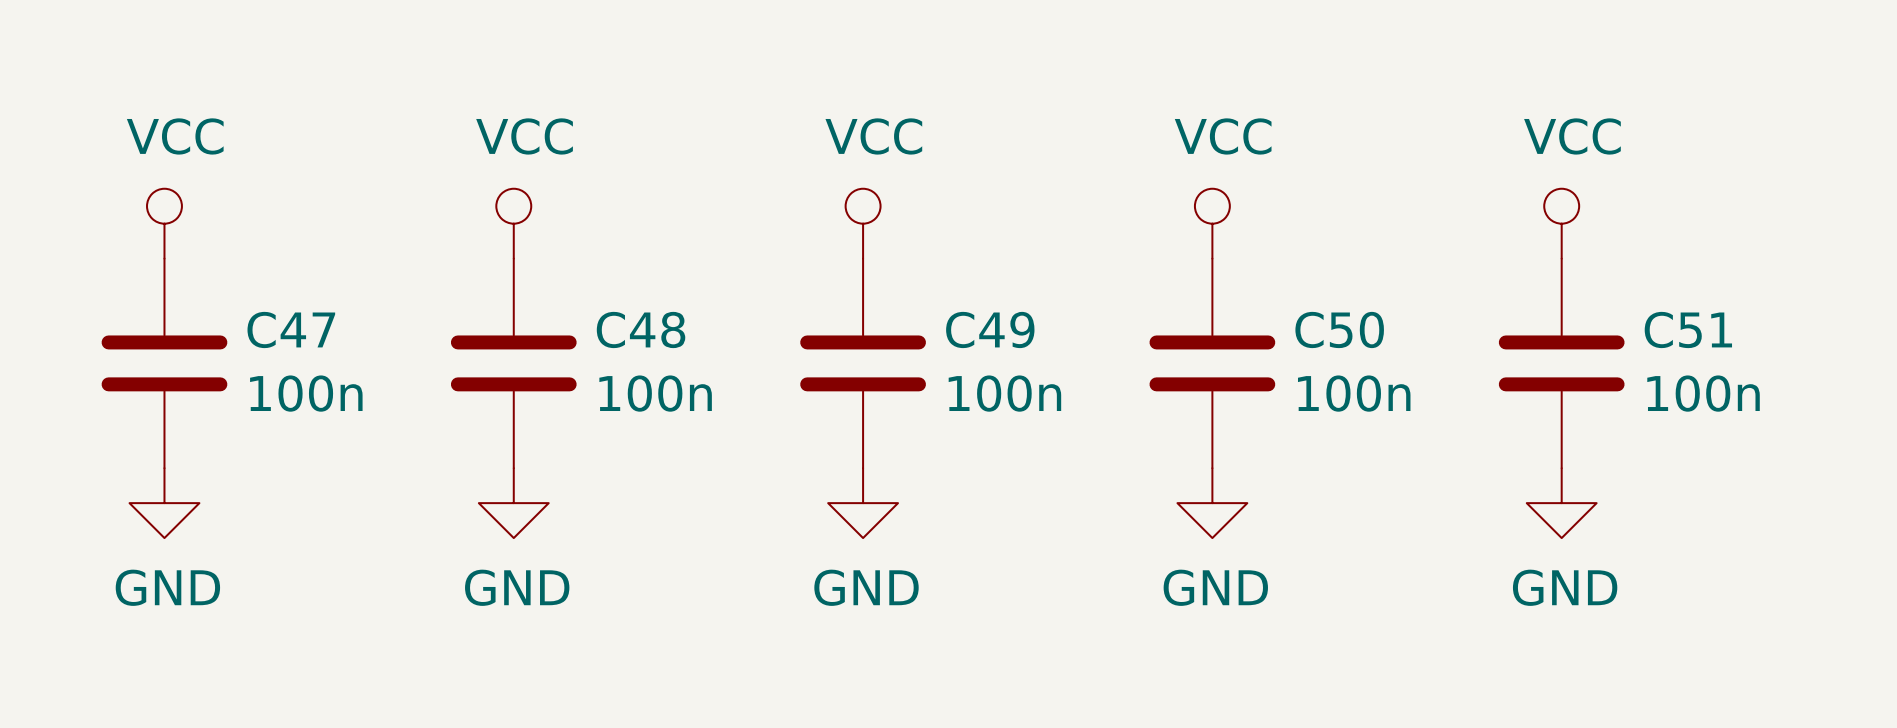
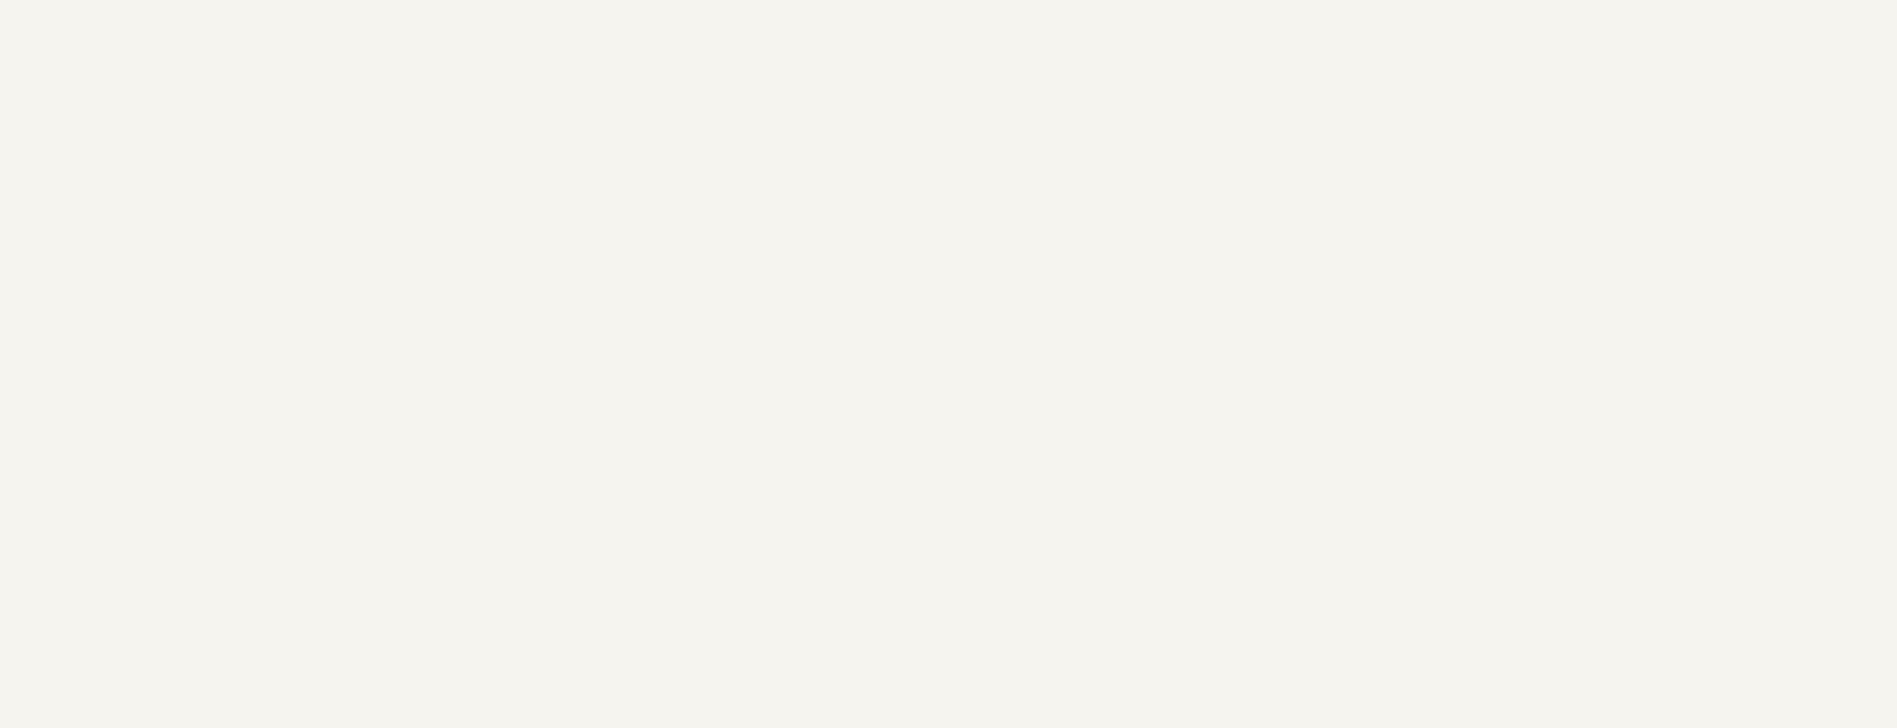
power symbol: VCC (164, 223) -> none
power symbol: VCC (513, 223) -> none
power symbol: VCC (863, 223) -> none
power symbol: VCC (1212, 223) -> none
power symbol: VCC (1561, 223) -> none
C47: 100n (164, 363) -> none
C48: 100n (513, 363) -> none
C49: 100n (863, 363) -> none
C50: 100n (1212, 363) -> none
C51: 100n (1561, 363) -> none
power symbol: GND (164, 503) -> none
power symbol: GND (513, 503) -> none
power symbol: GND (863, 503) -> none
power symbol: GND (1212, 503) -> none
power symbol: GND (1561, 503) -> none

